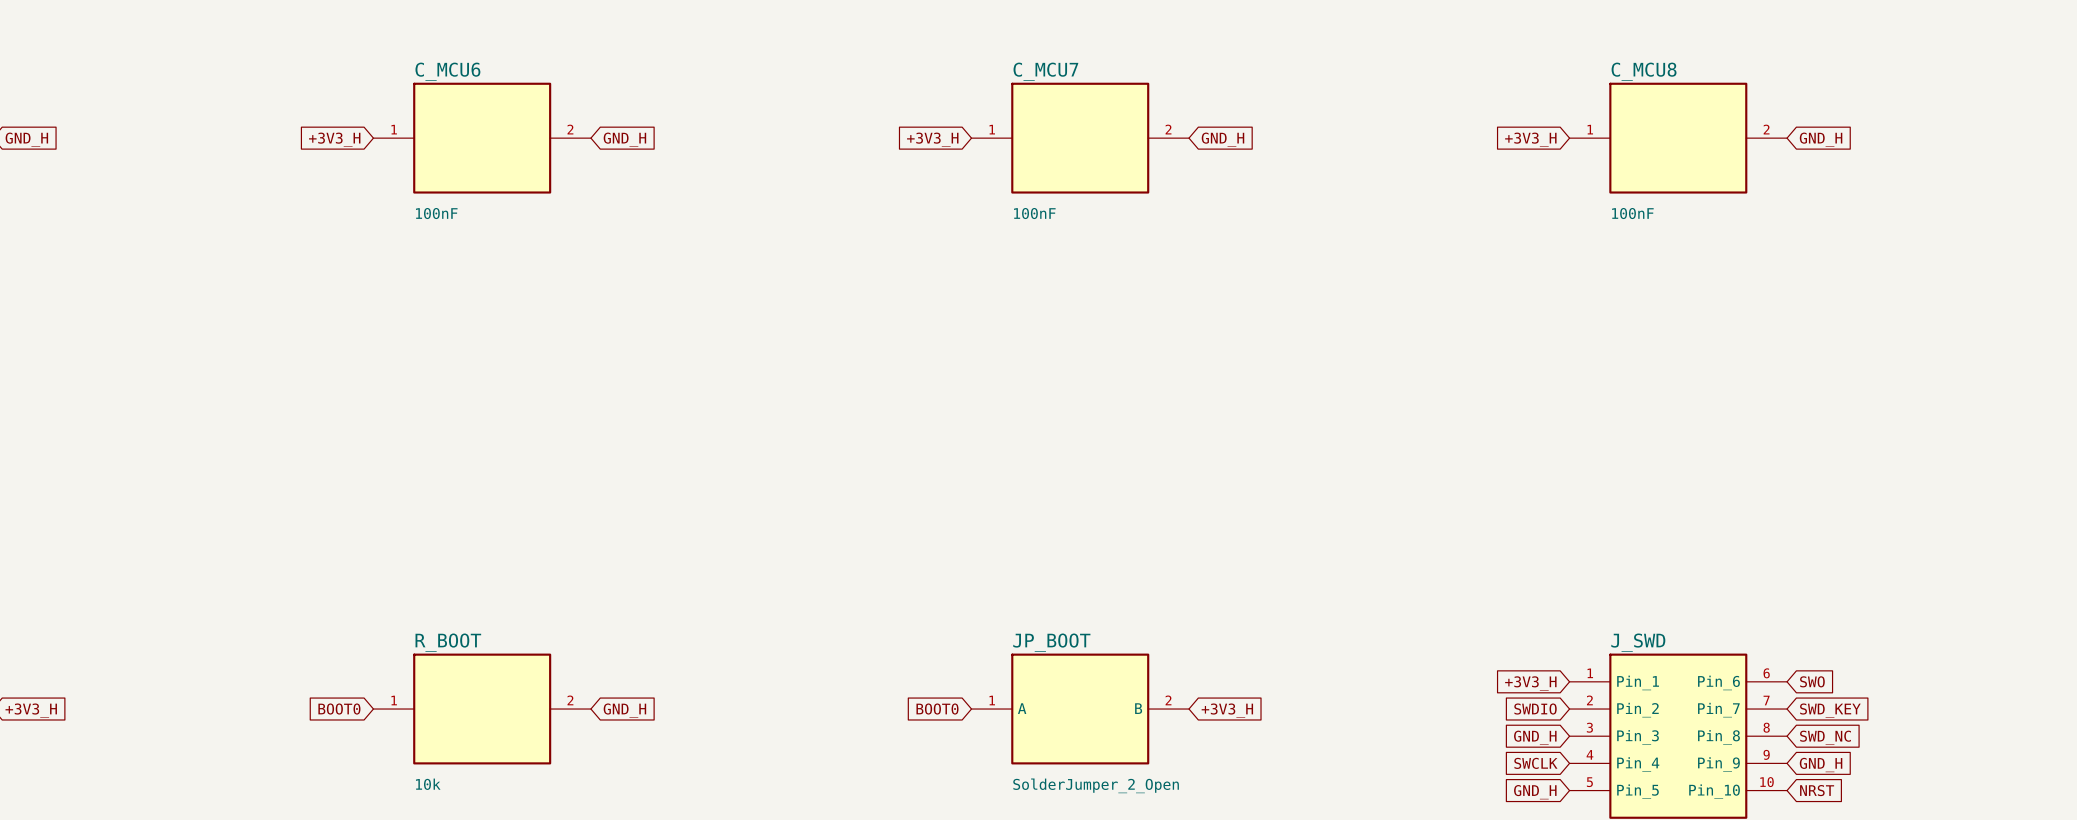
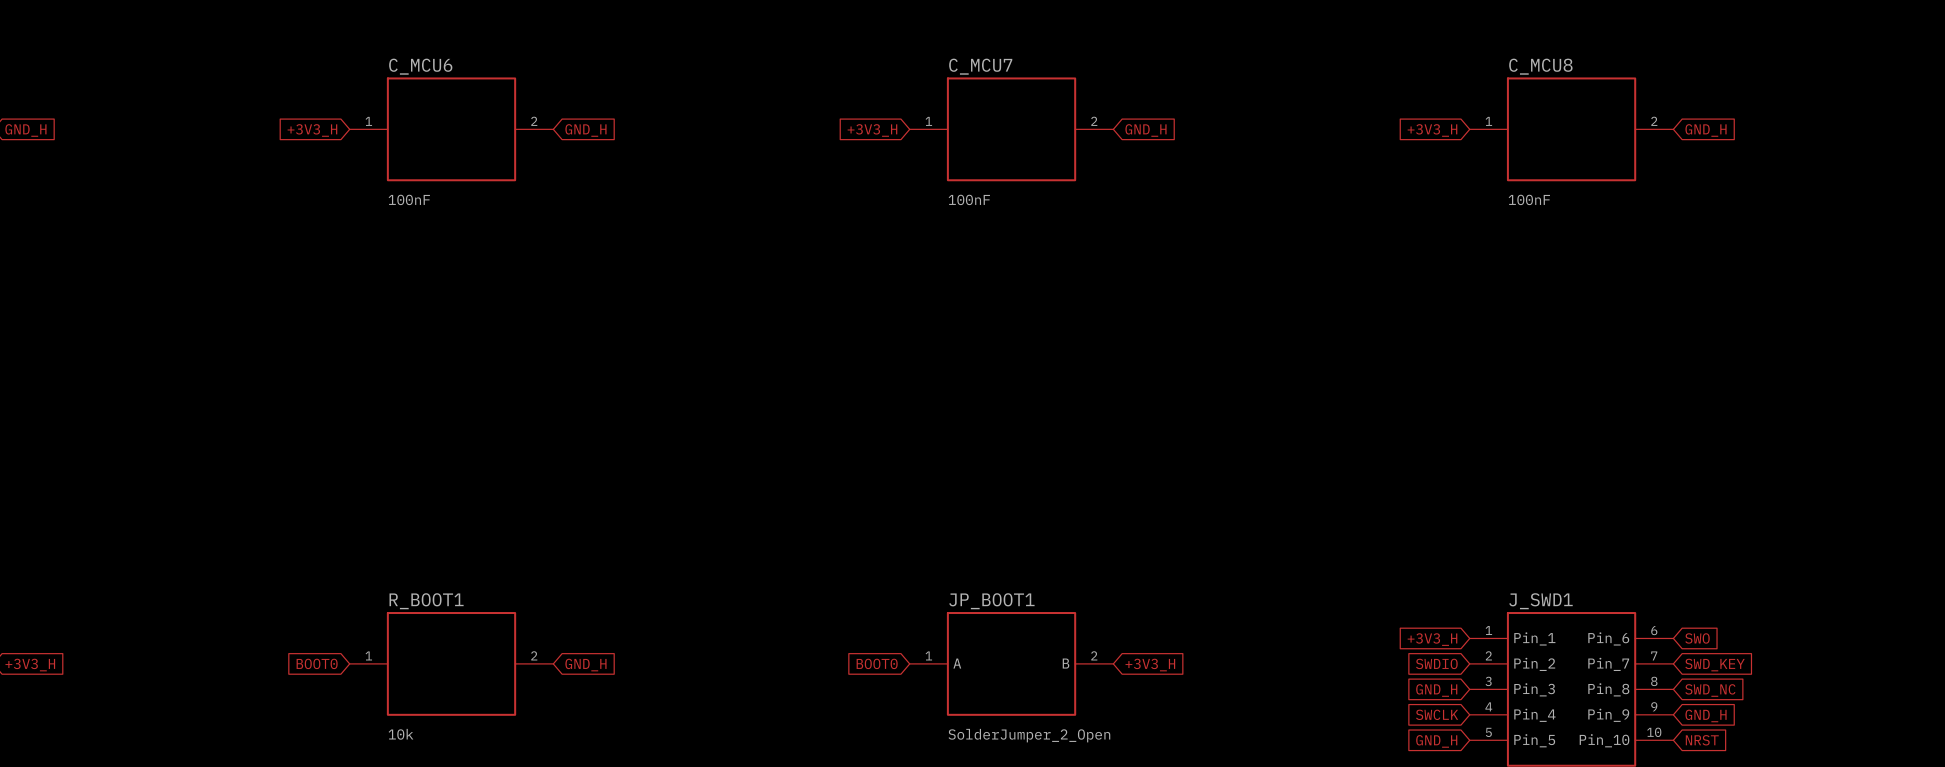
R_BOOT name: R_BOOT (448, 642) -> R_BOOT1 (426, 601)
JP_BOOT name: JP_BOOT (1051, 642) -> JP_BOOT1 (991, 601)
J_SWD name: J_SWD (1638, 642) -> J_SWD1 (1540, 601)

